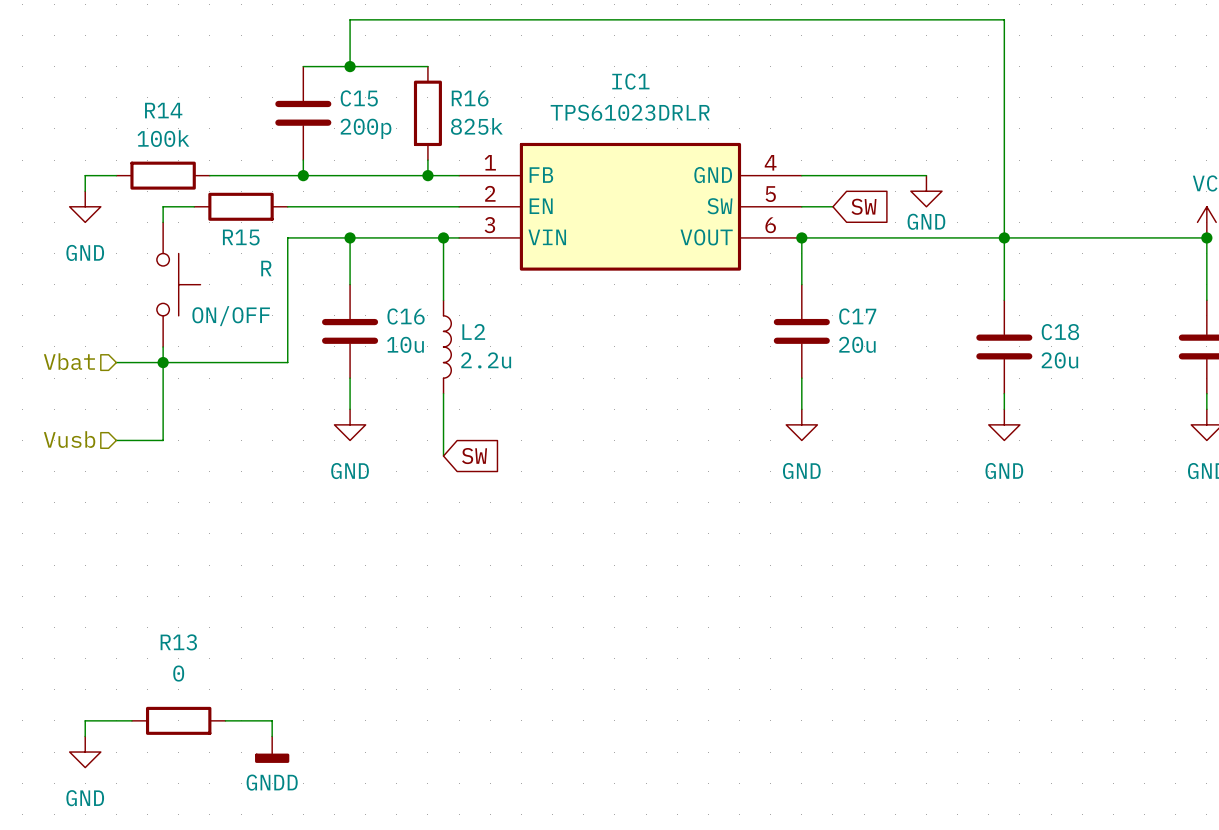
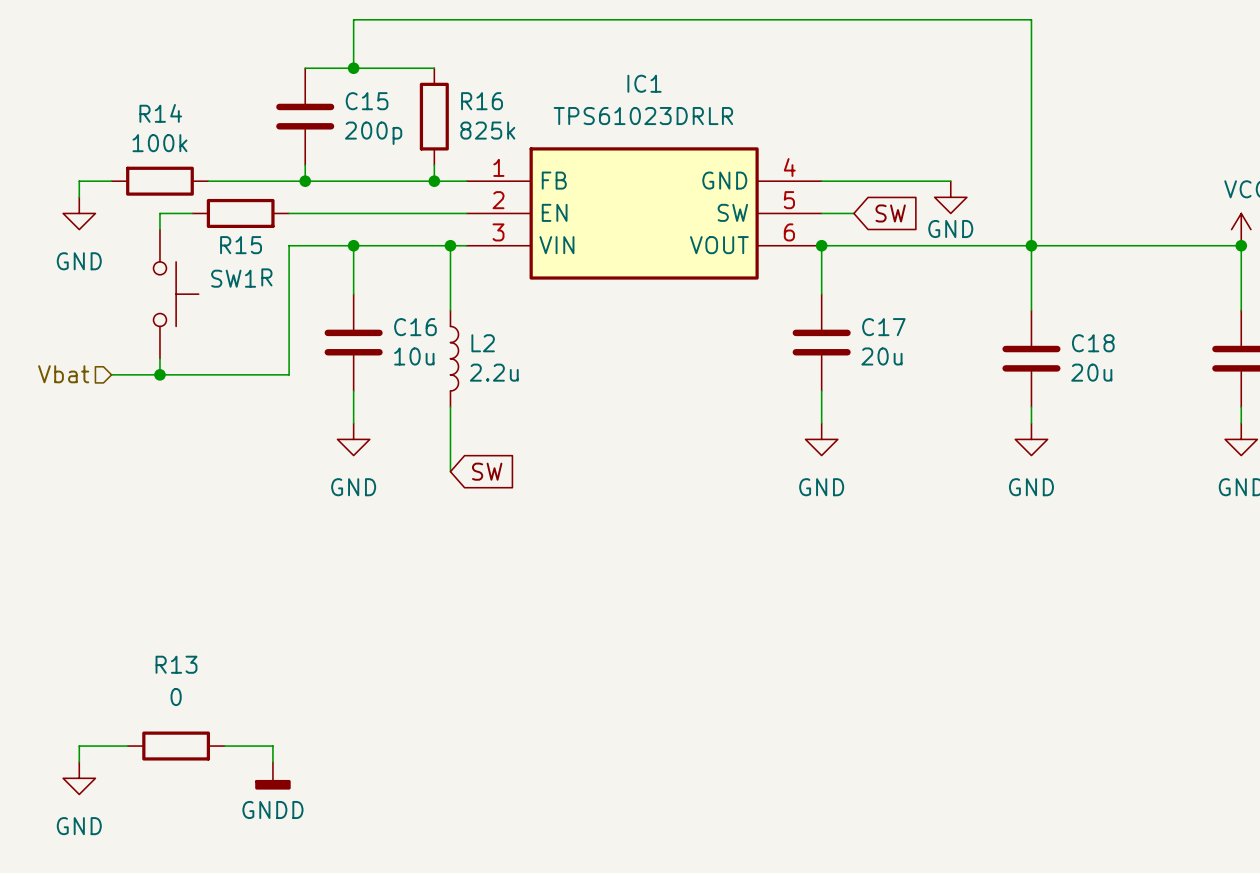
ON/OFF name: ON/OFF (231, 316) -> SW1 (233, 278)
wire: (163, 362) (163, 440) (116, 440) -> none
hierarchical label: Vusb (69, 439) -> none

